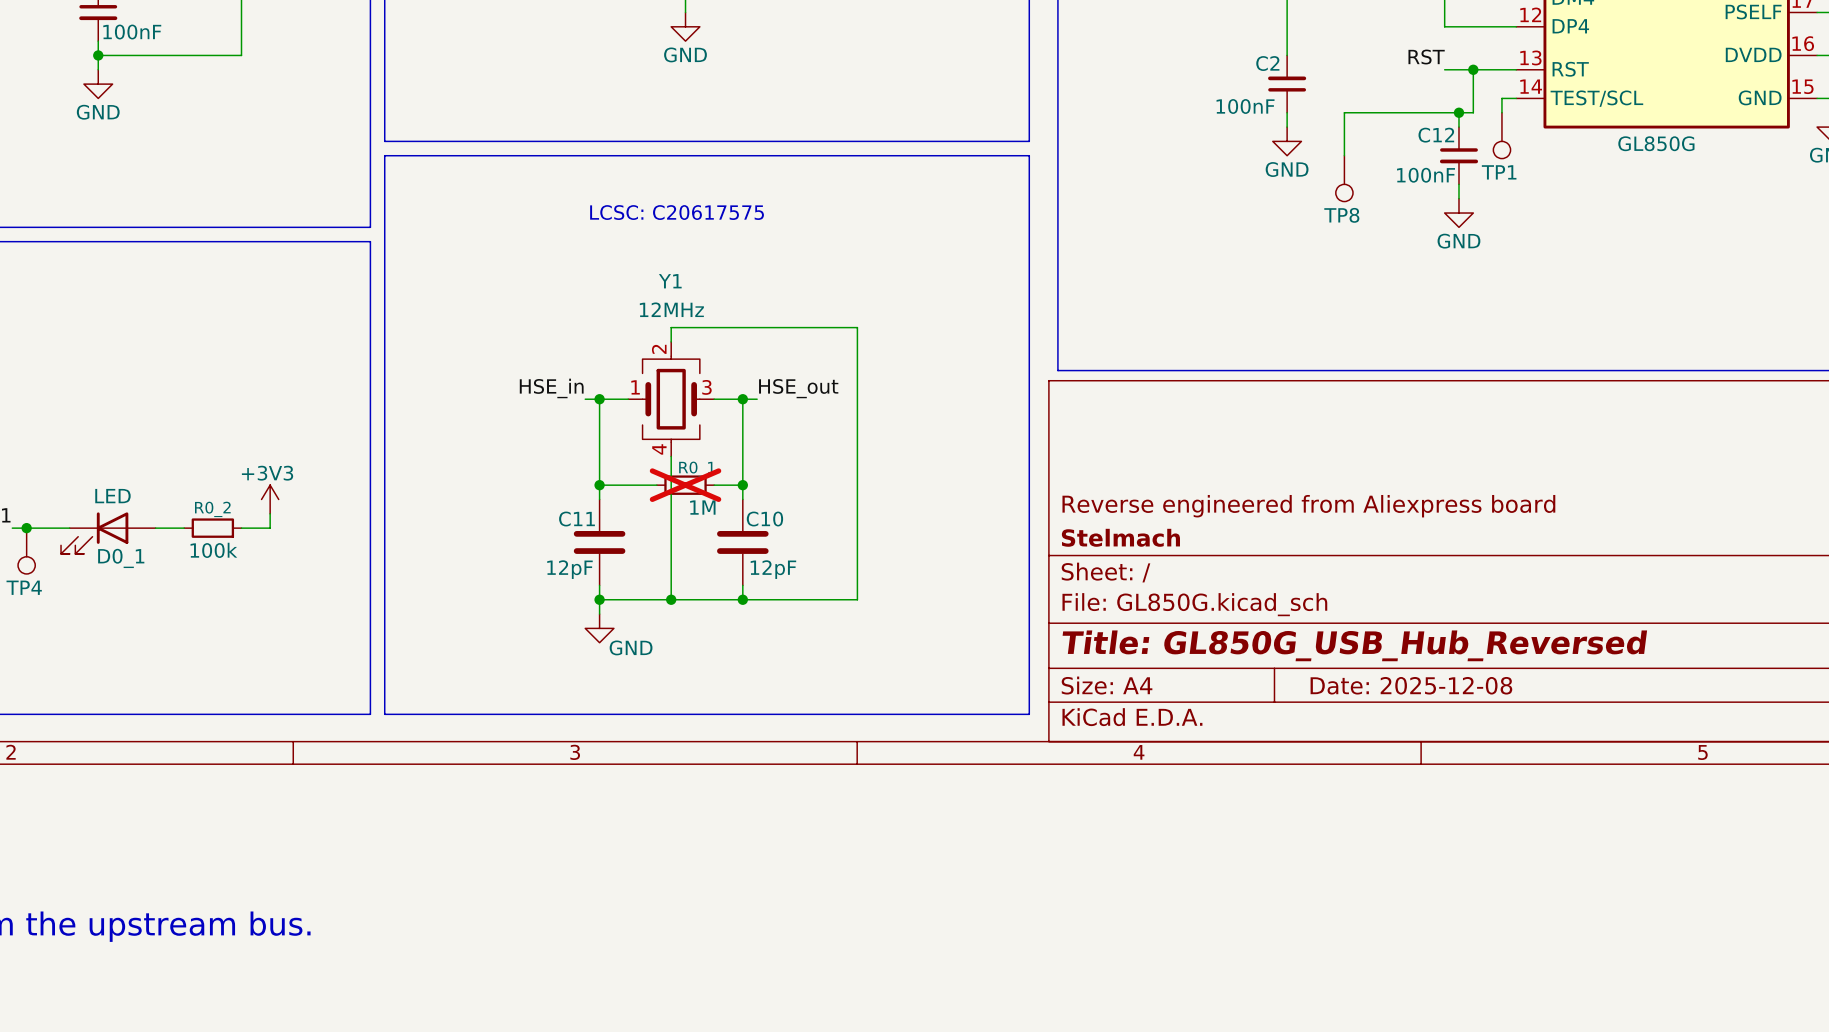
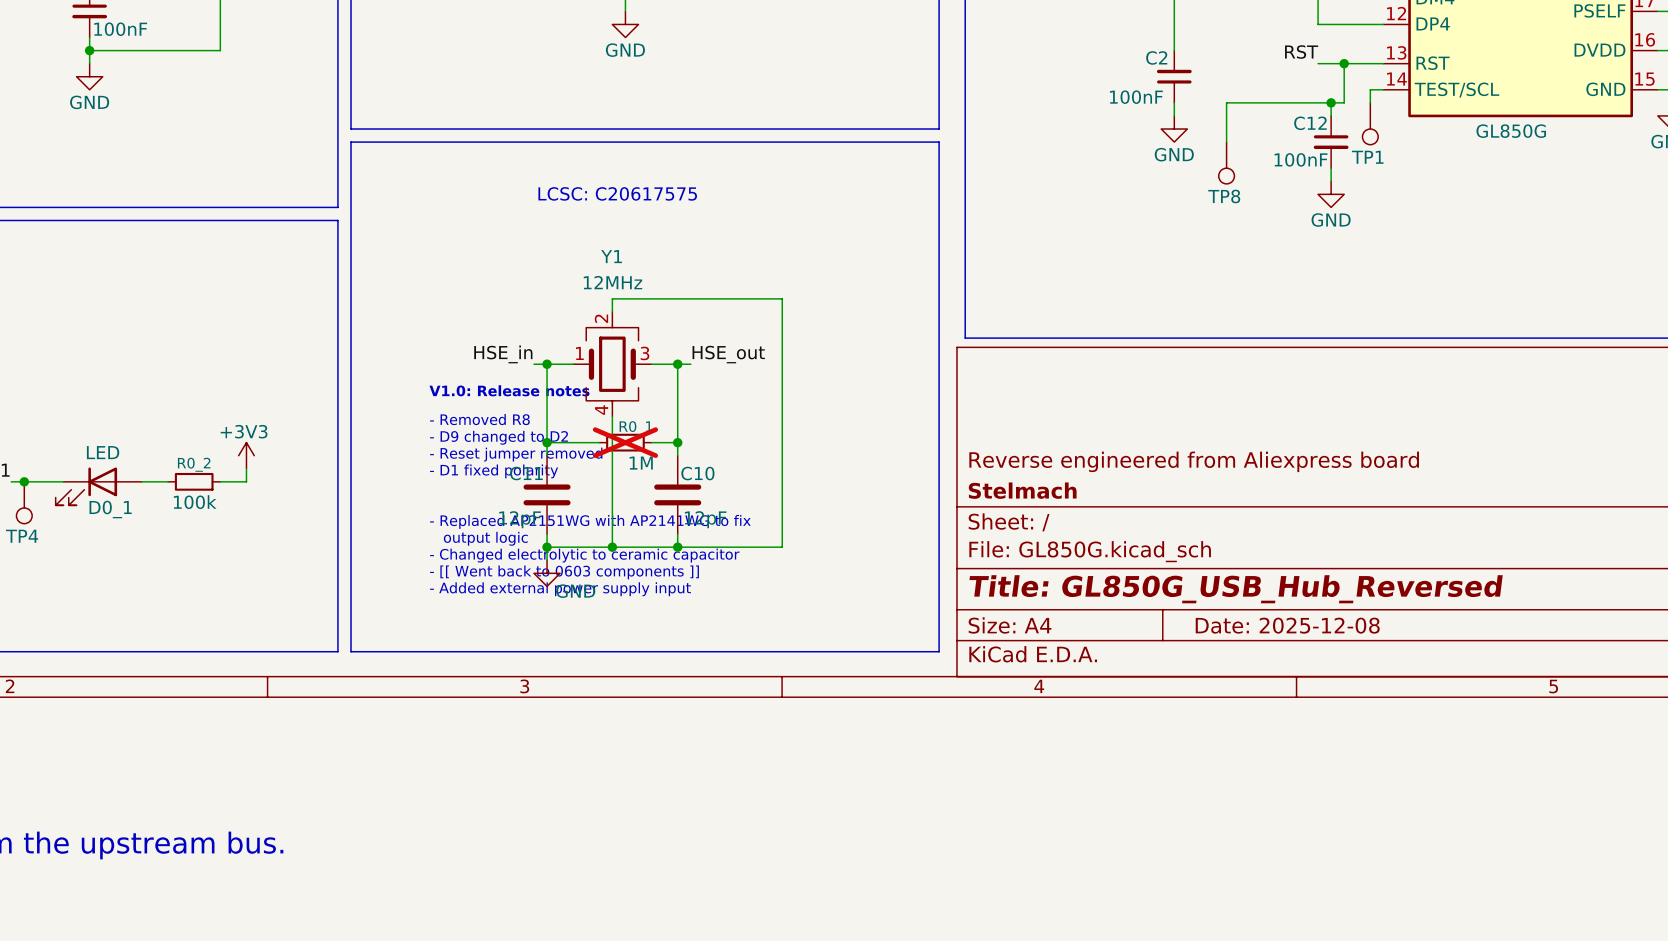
text: none -> V1.0: Release notes (509, 390)
text: none -> - Removed R8 (479, 419)
text: none -> - D9 changed to D2 (499, 437)
text: none -> - Reset jumper removed (516, 454)
text: none -> - D1 fixed polarity (494, 471)
text: none -> - Replaced AP2151WG with AP2141WG to fix (590, 521)
text: none -> output logic (485, 538)
text: none -> - Changed electrolytic to ceramic capacitor (584, 555)
text: none -> - [[ Went back to 0603 components ]] (564, 572)
text: none -> - Added external power supply input (560, 589)

